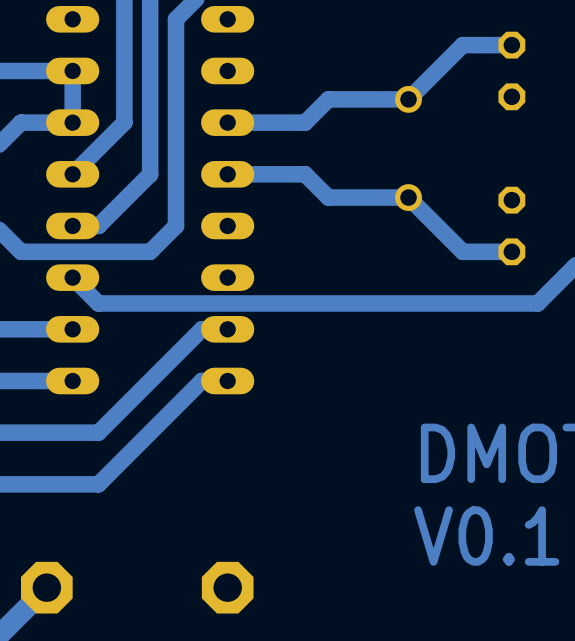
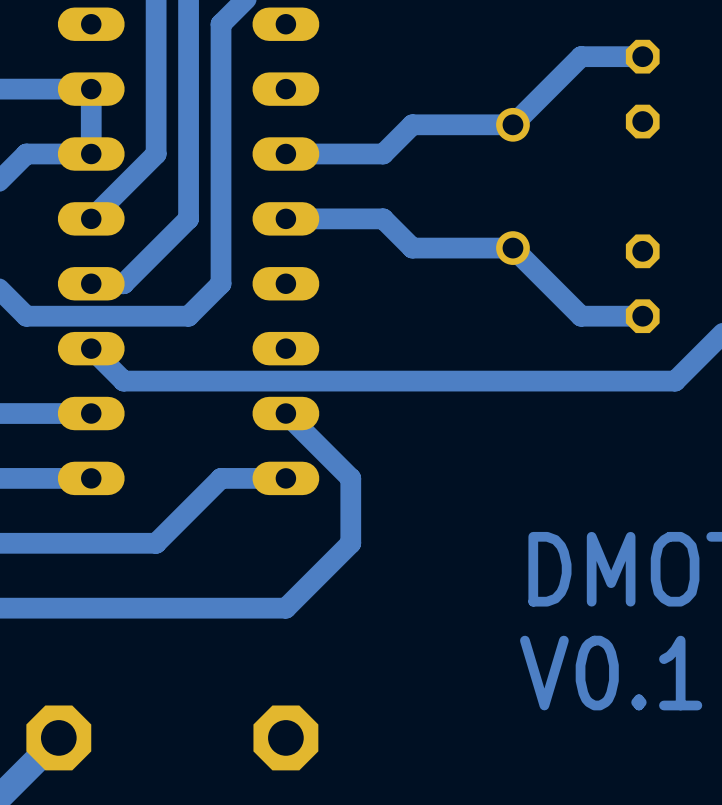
bottom track: (227, 329) (201, 329) (98, 432) -> (285, 413) (350, 478) (350, 543) (285, 608) (123, 608)
bottom track: (201, 380) (98, 484) -> (253, 478) (221, 478) (156, 543) (123, 543)

